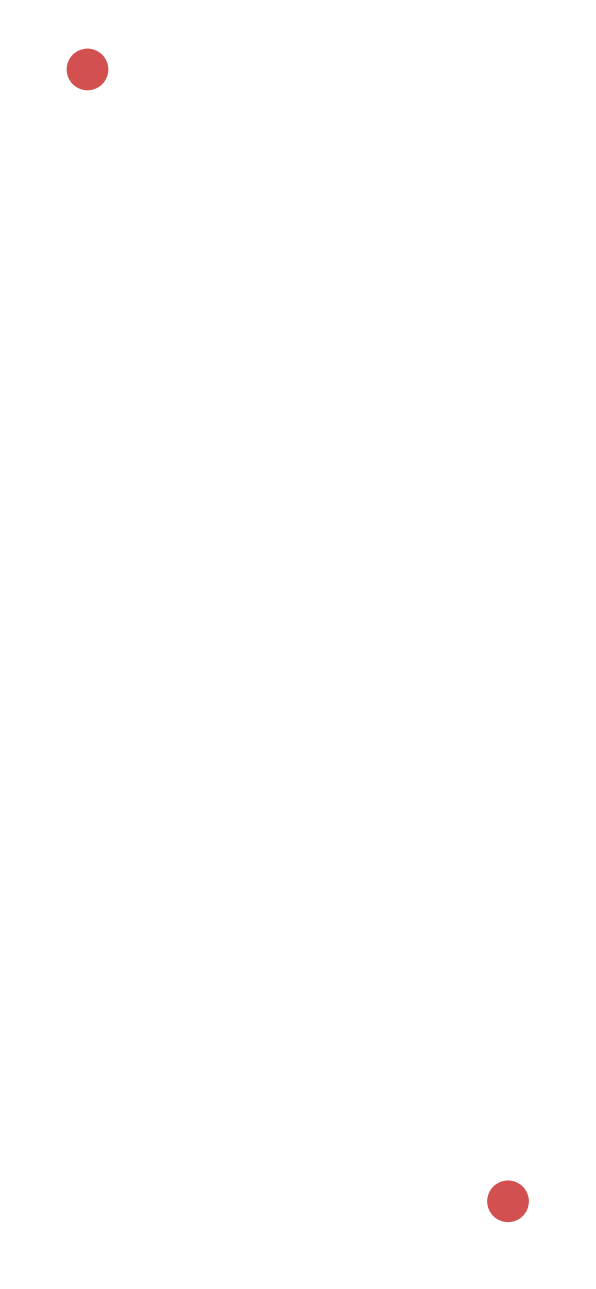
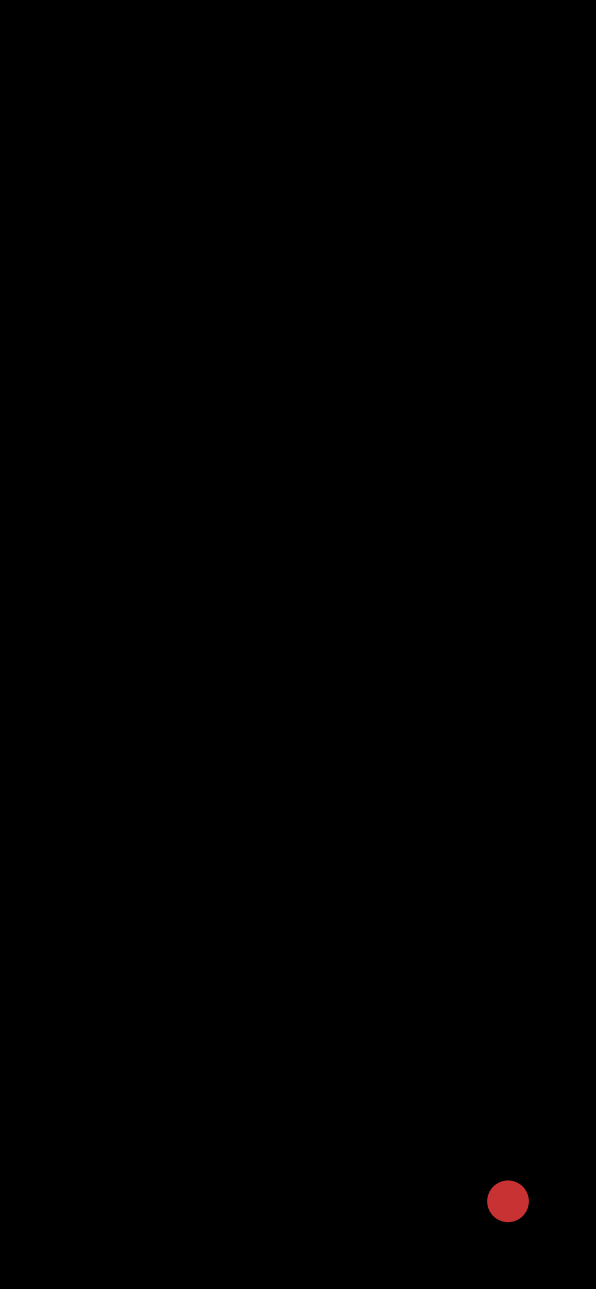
part: (87, 69) -> none

